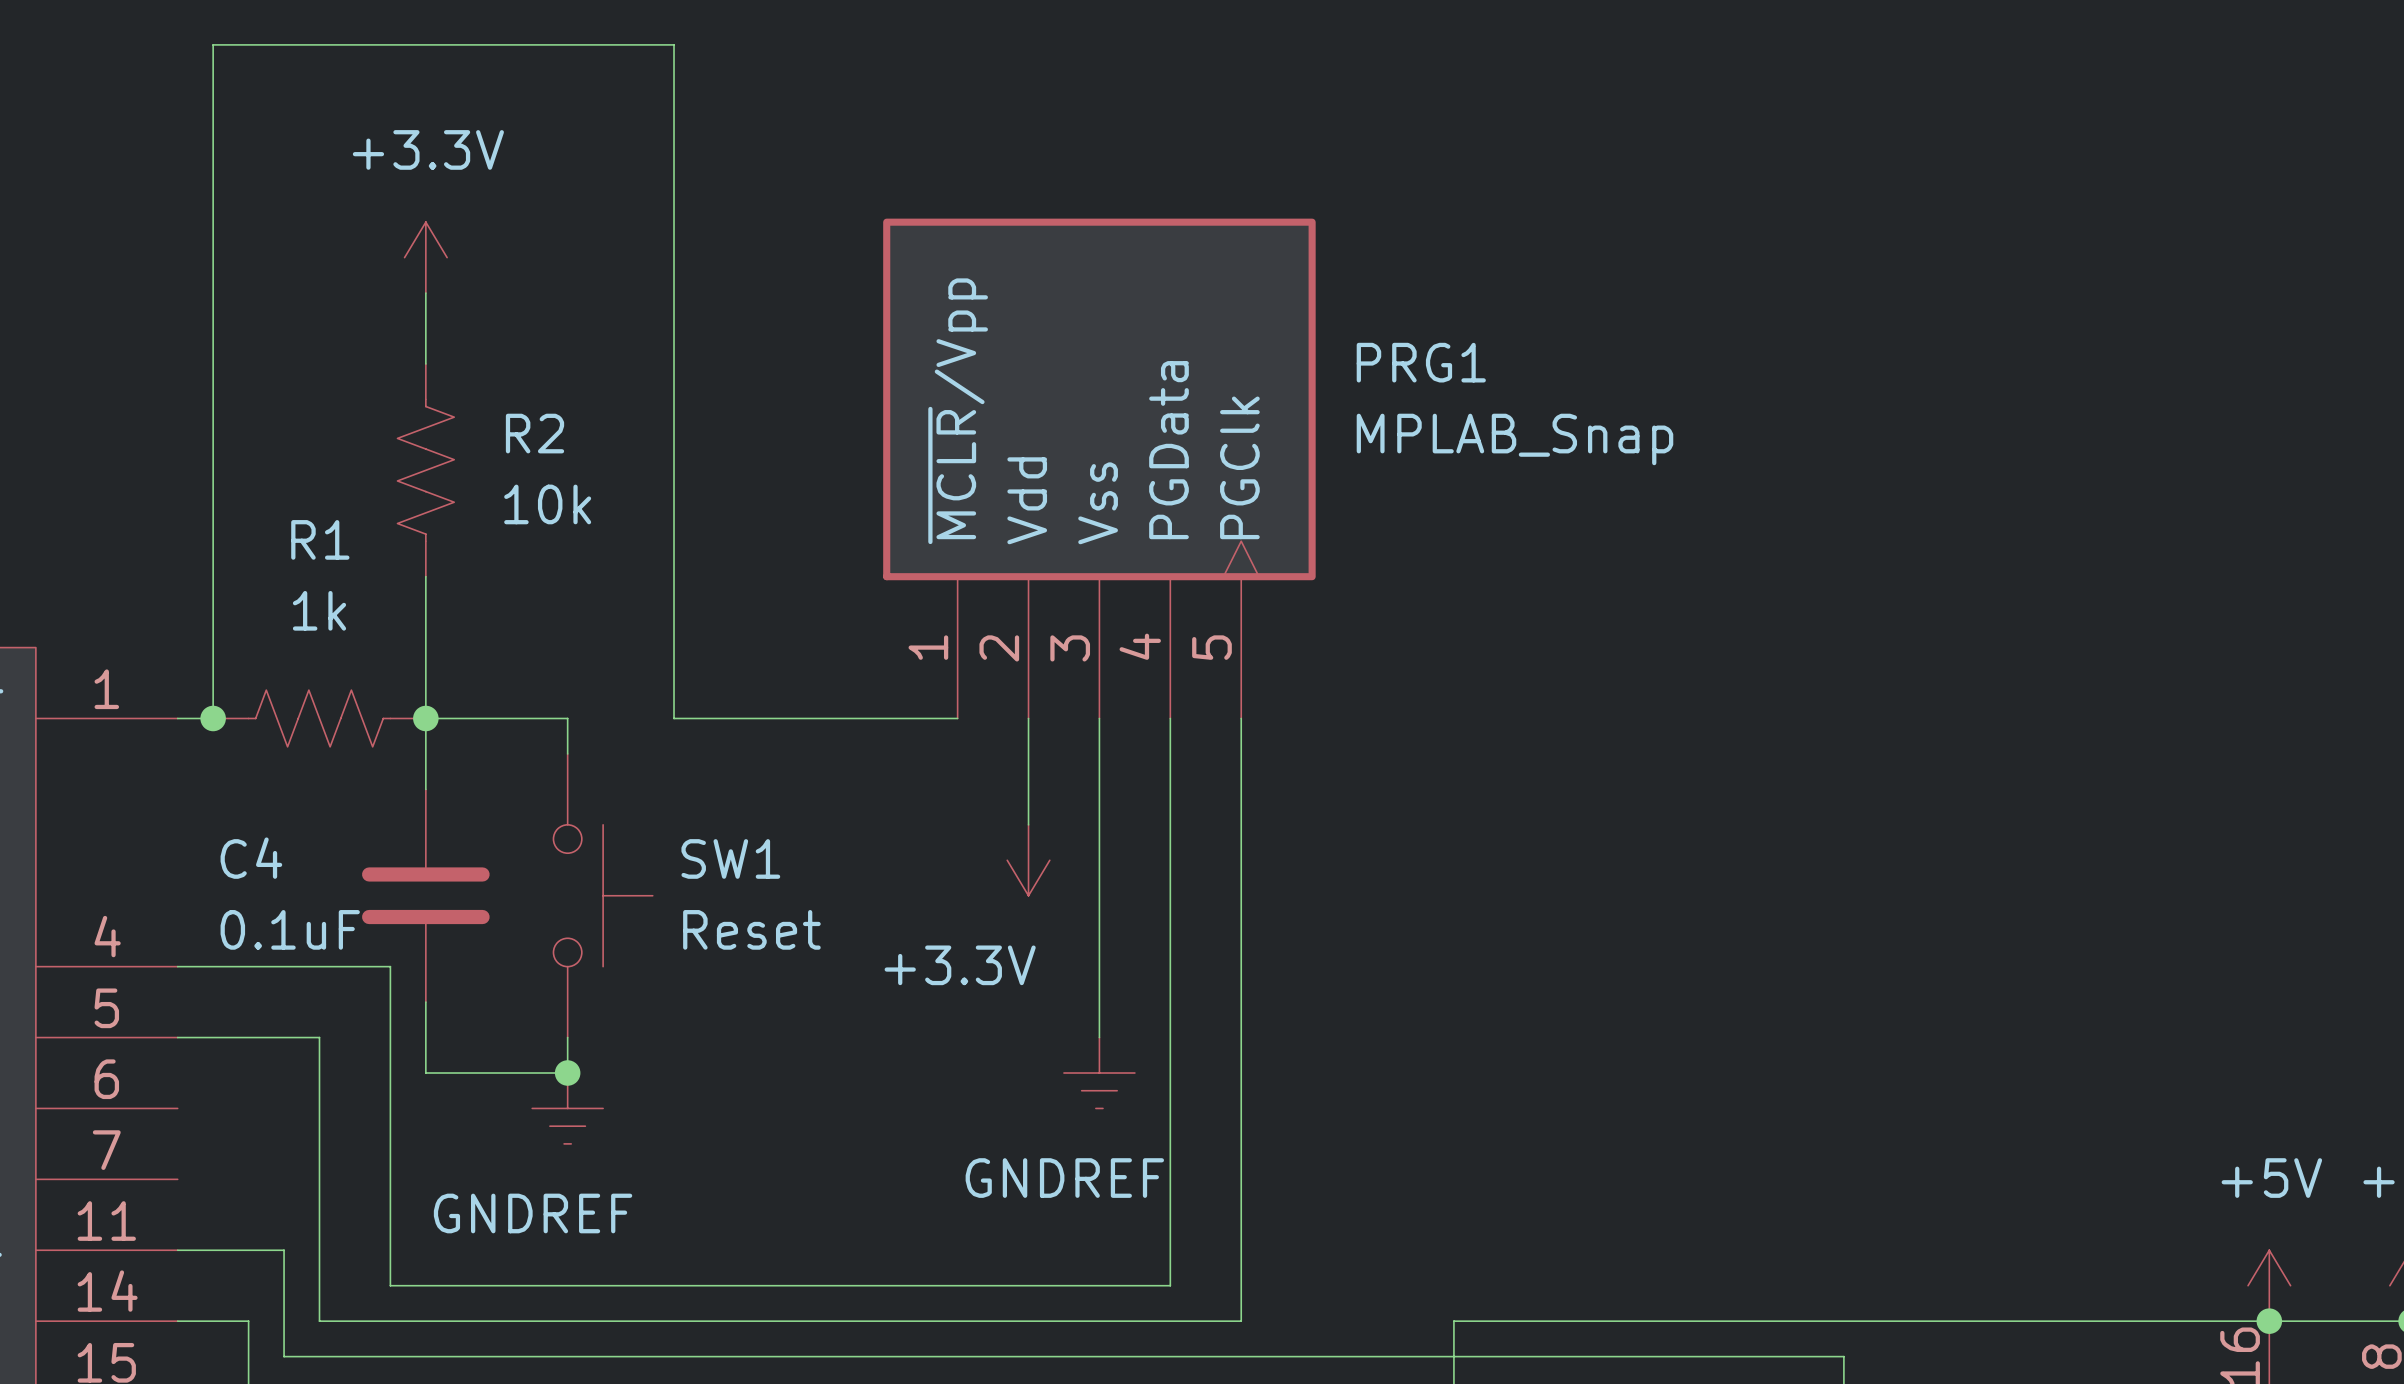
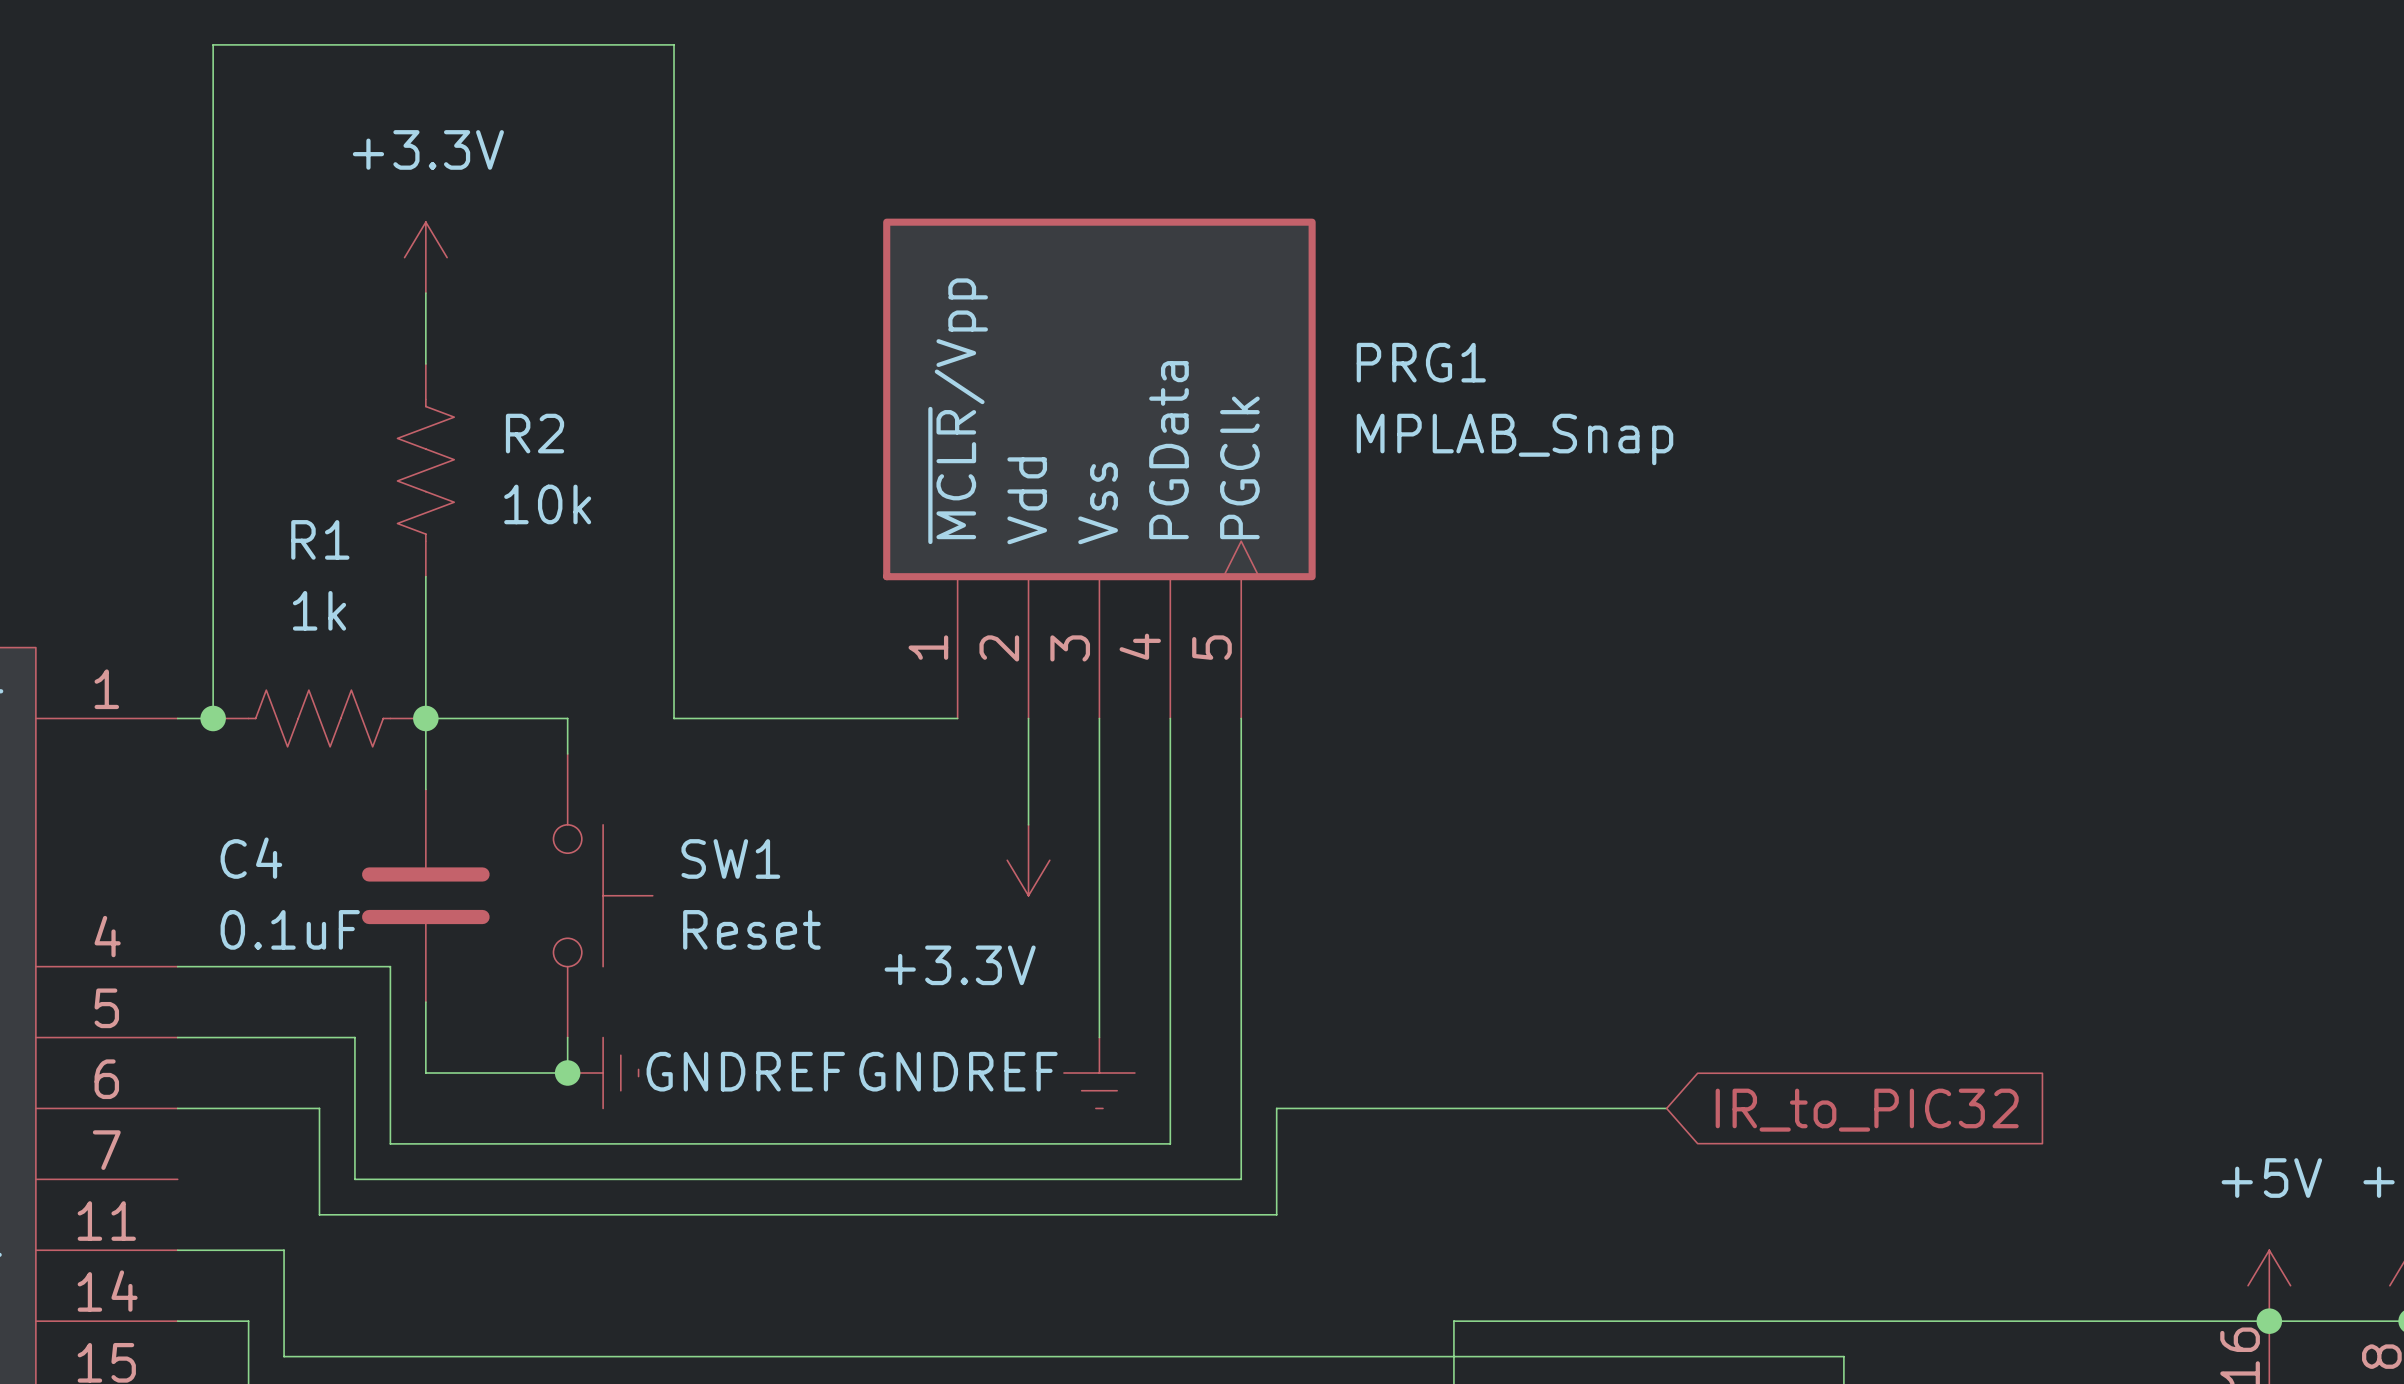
wire: (319, 1037) (319, 1108) -> (177, 1108) (319, 1108)
power symbol rotation: 0° (567, 1108) -> 90° counterclockwise (603, 1073)
power symbol position: GNDREF (567, 1108) -> GNDREF (603, 1073)
wire: none -> (1666, 1108) (1276, 1108) (1276, 1214) (319, 1214)
global label: none -> IR_to_PIC32 (1867, 1110)
wire: (390, 1143) (390, 1285) (1170, 1285) (1170, 1143) -> (390, 1143) (1170, 1143)
power symbol text position: GNDREF (1064, 1178) -> GNDREF (958, 1071)
wire: (1241, 1179) (1241, 1321) (319, 1321) (319, 1214) -> (1241, 1179) (354, 1179) (354, 1037) (319, 1037)

